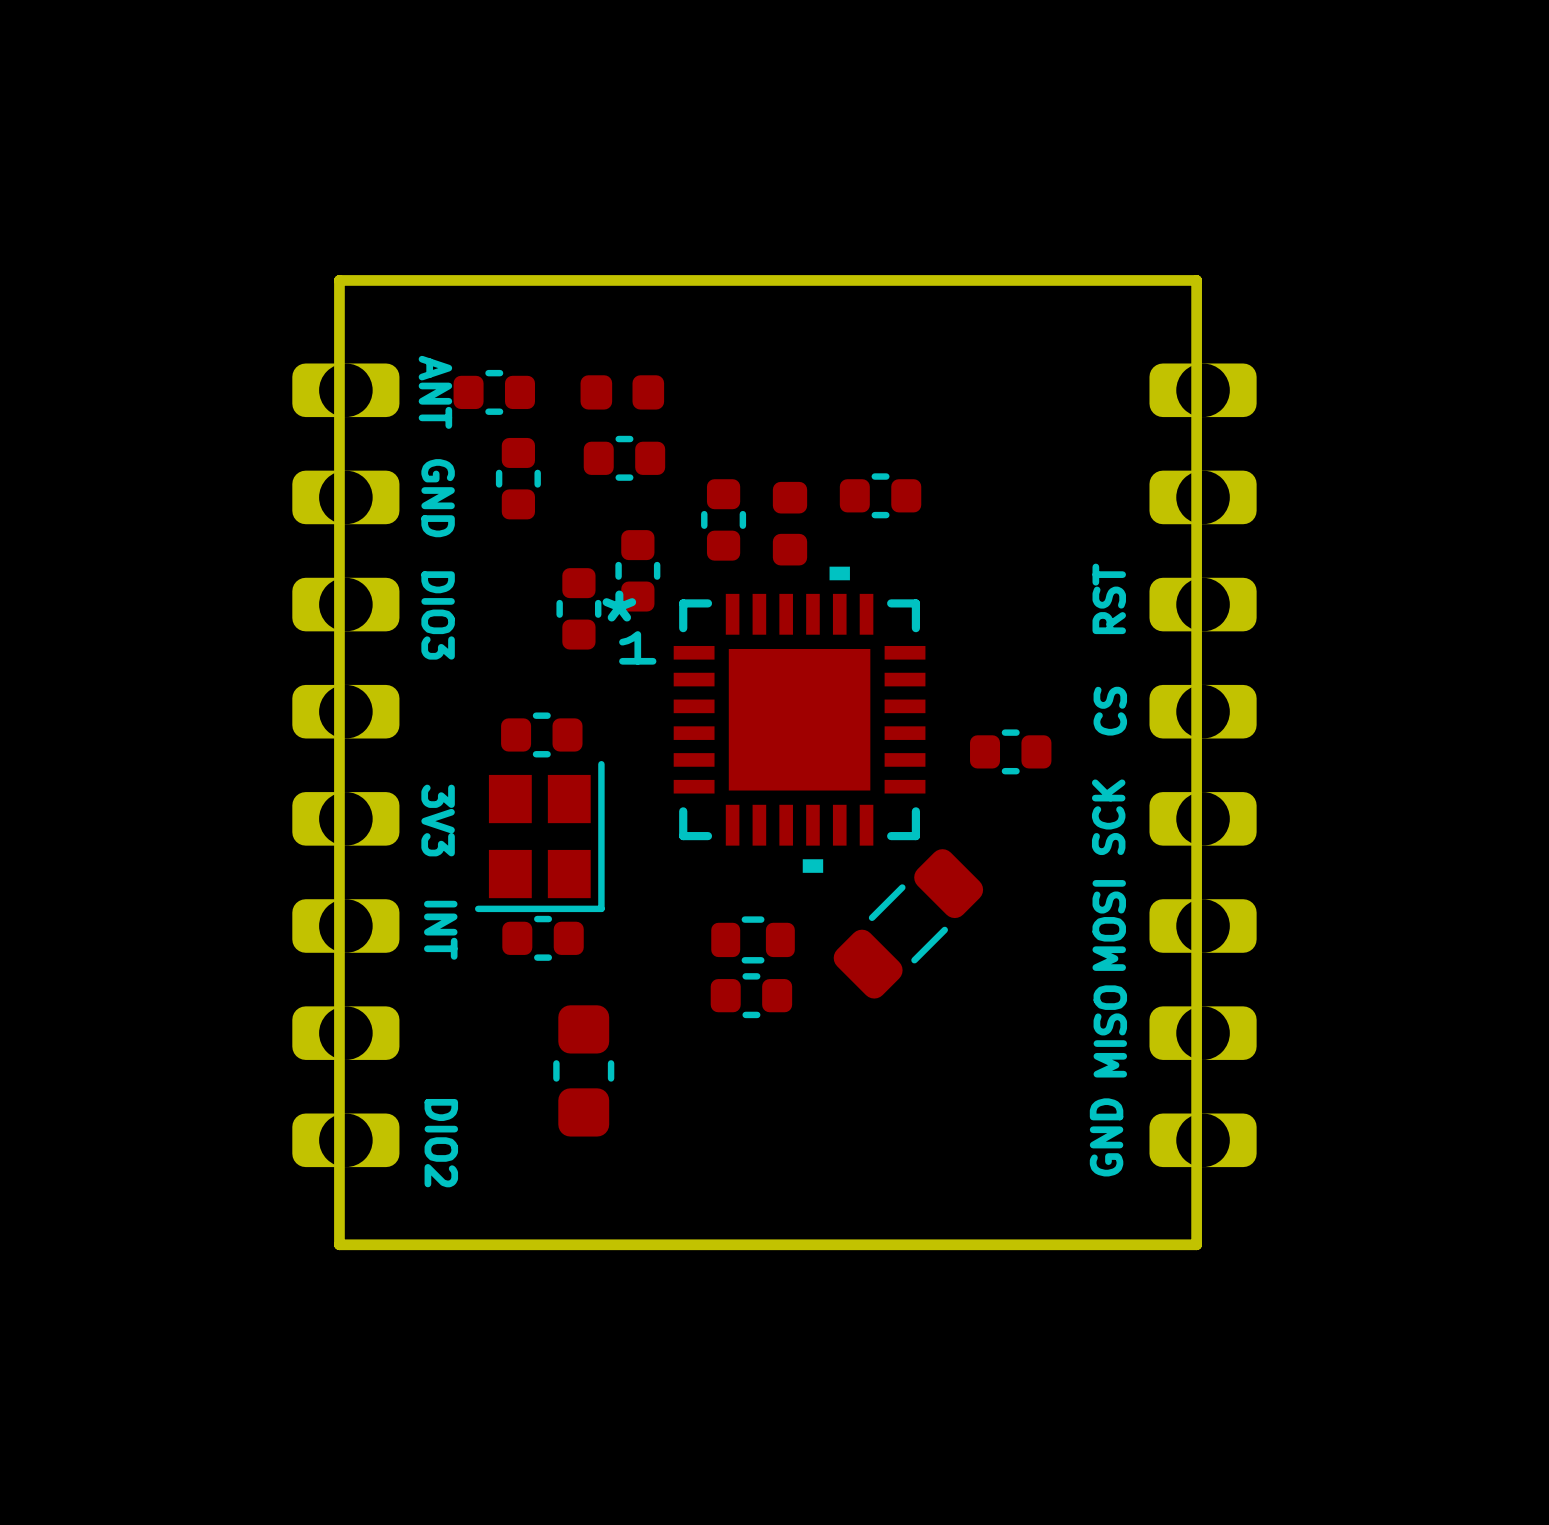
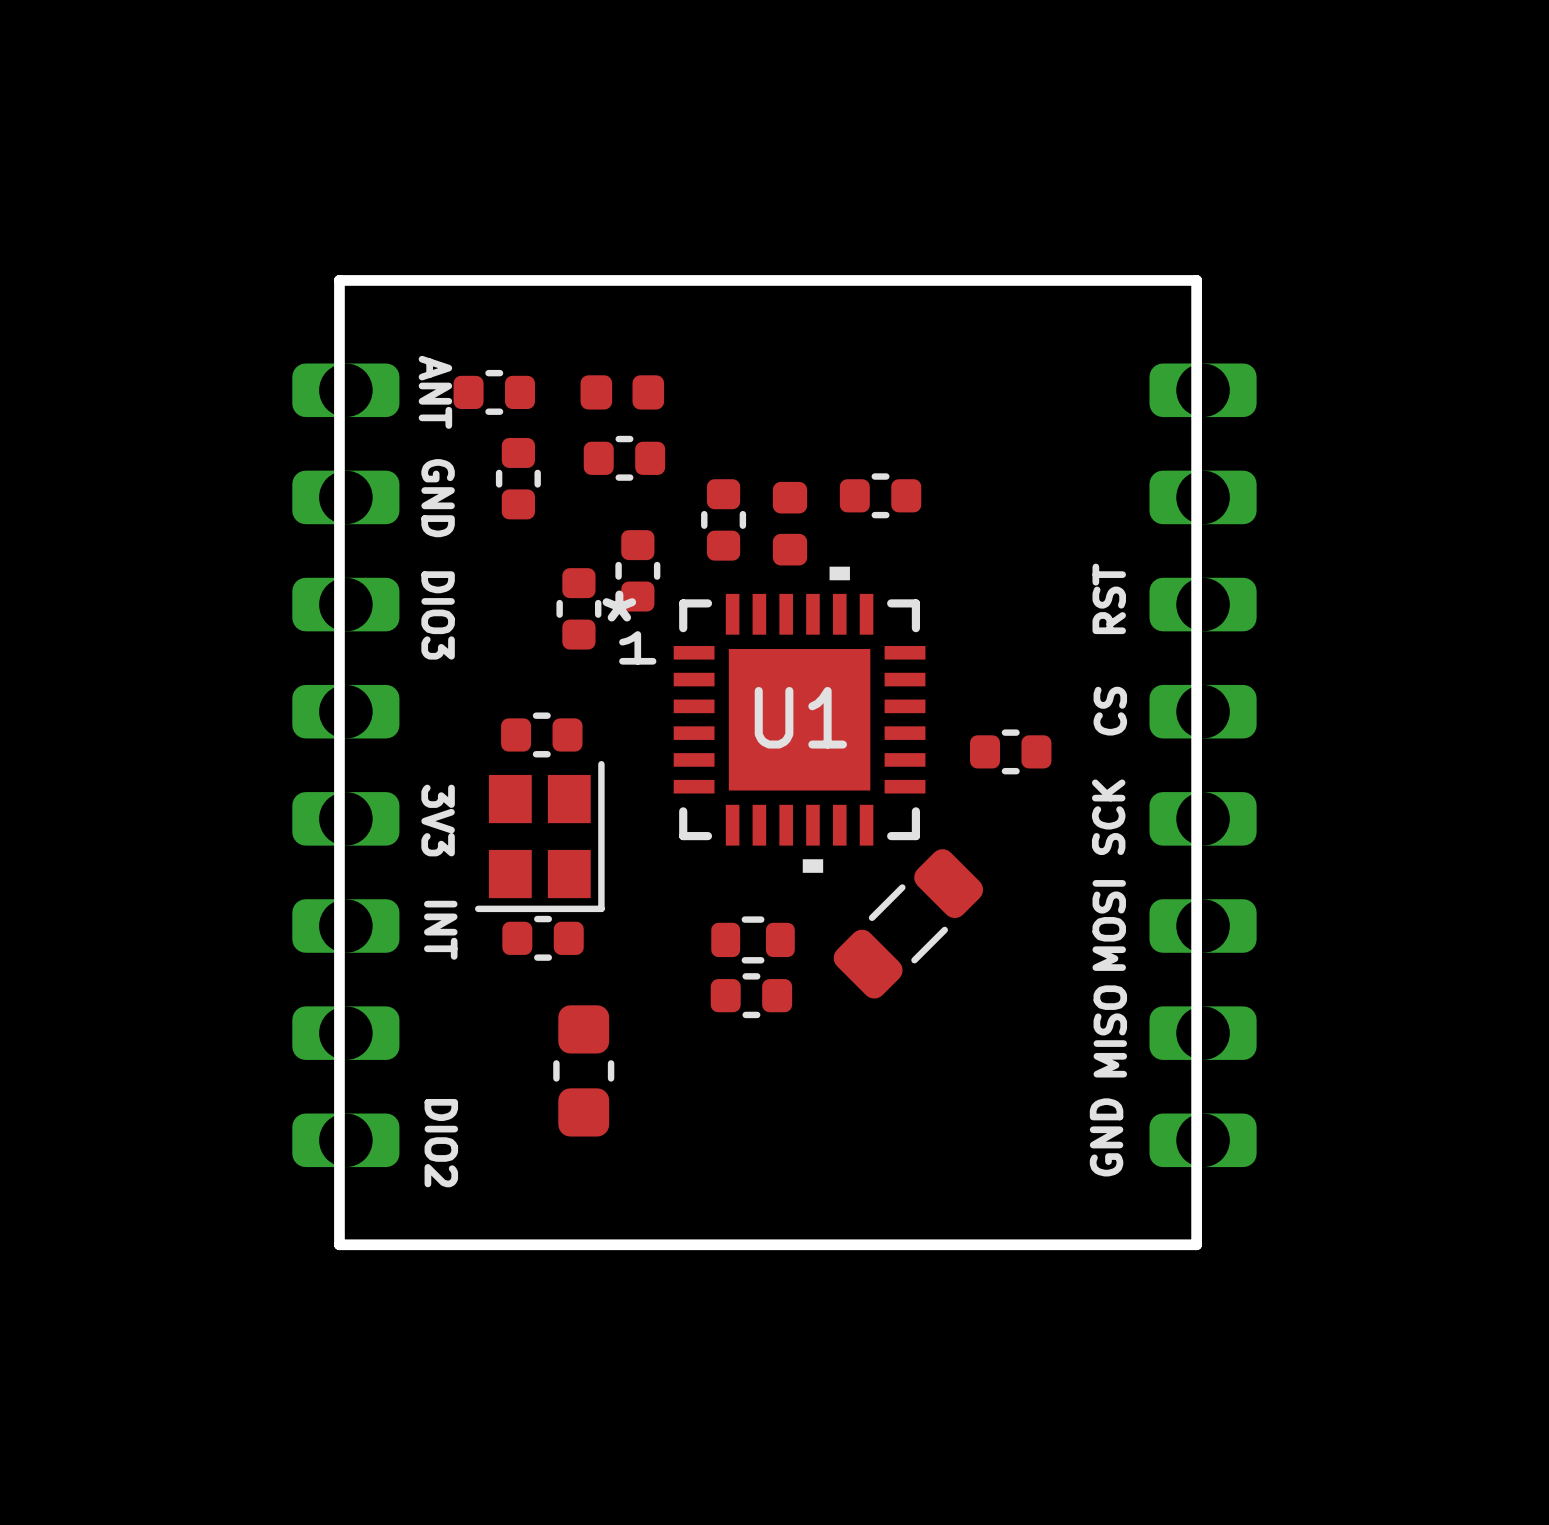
U1 name: none -> U1 (800, 717)

